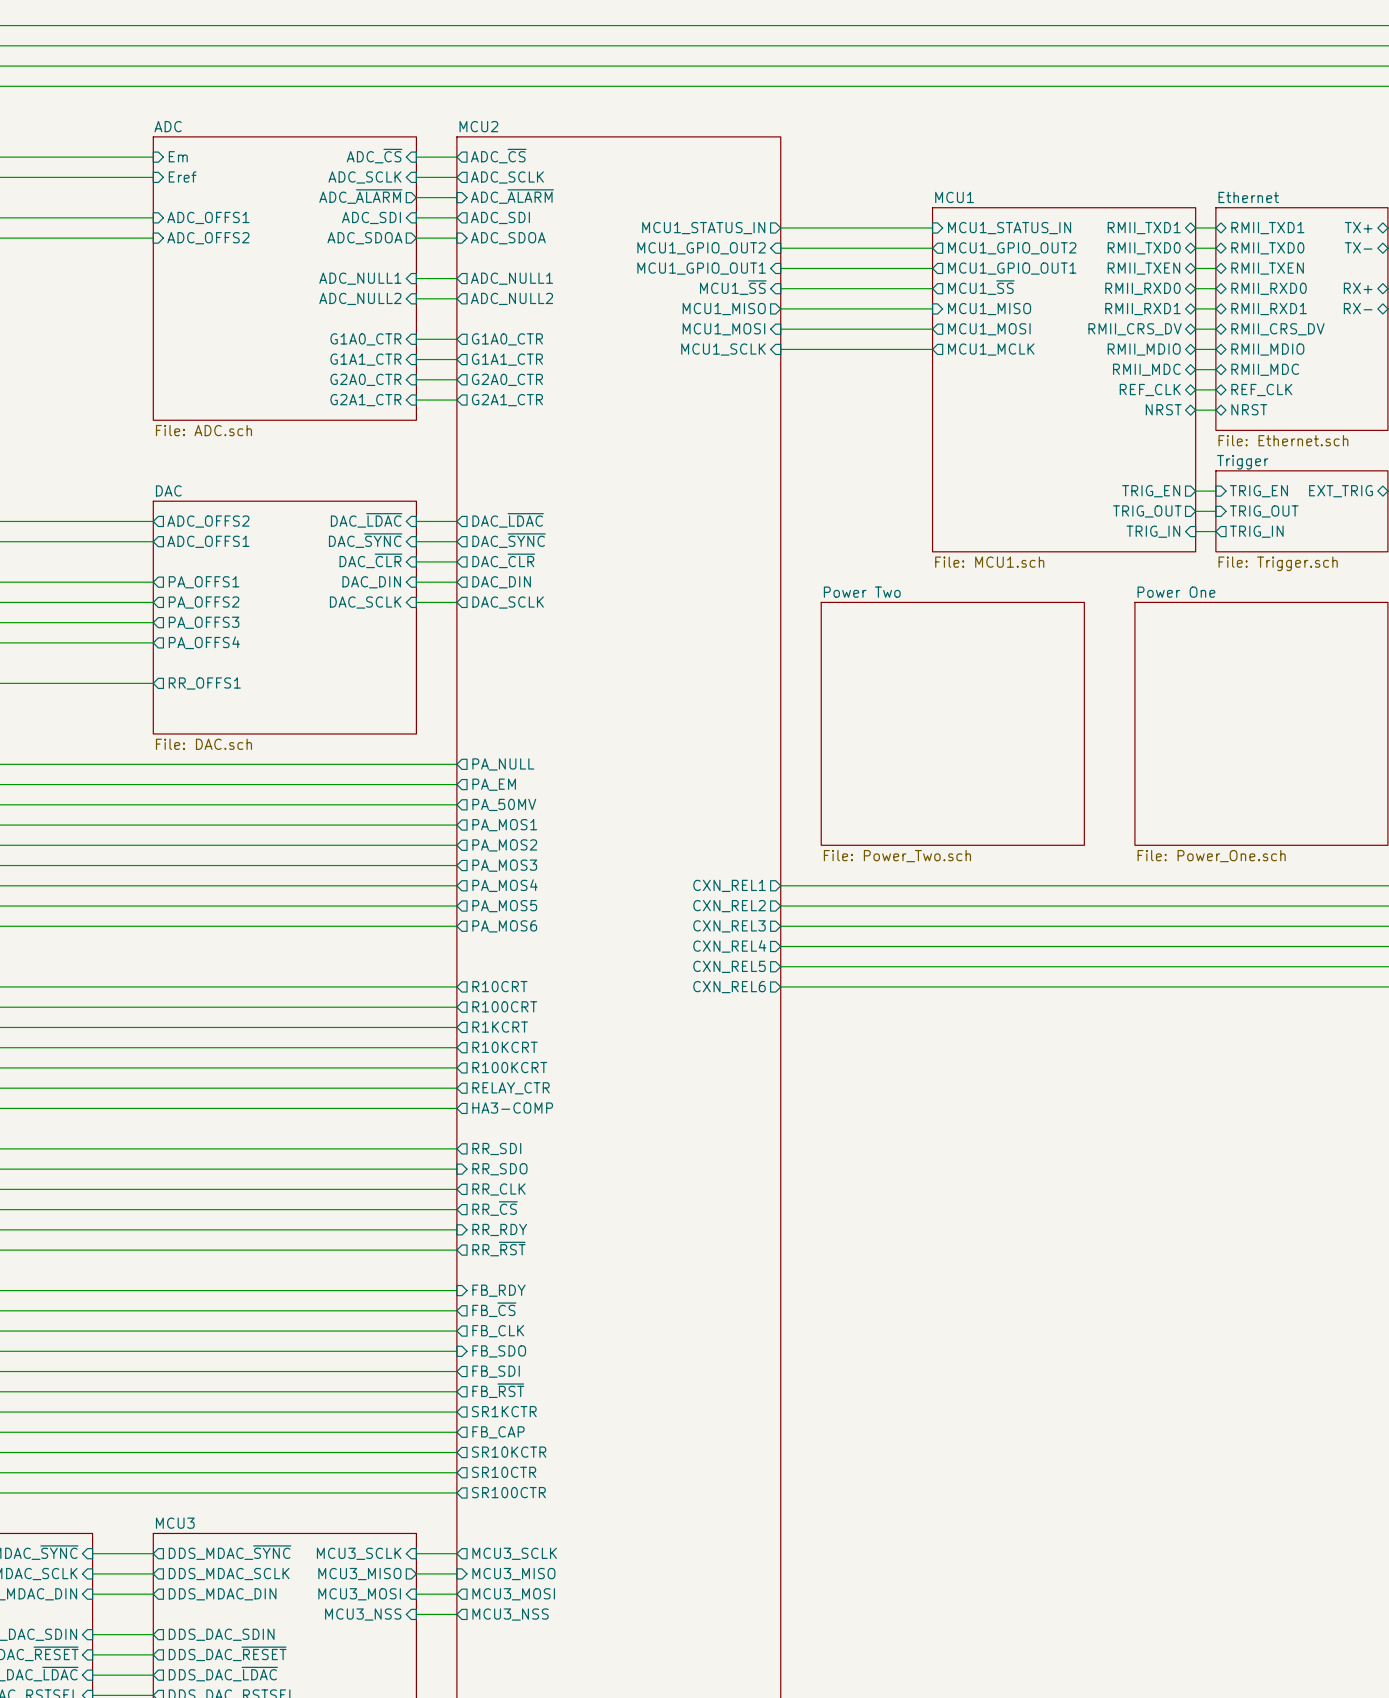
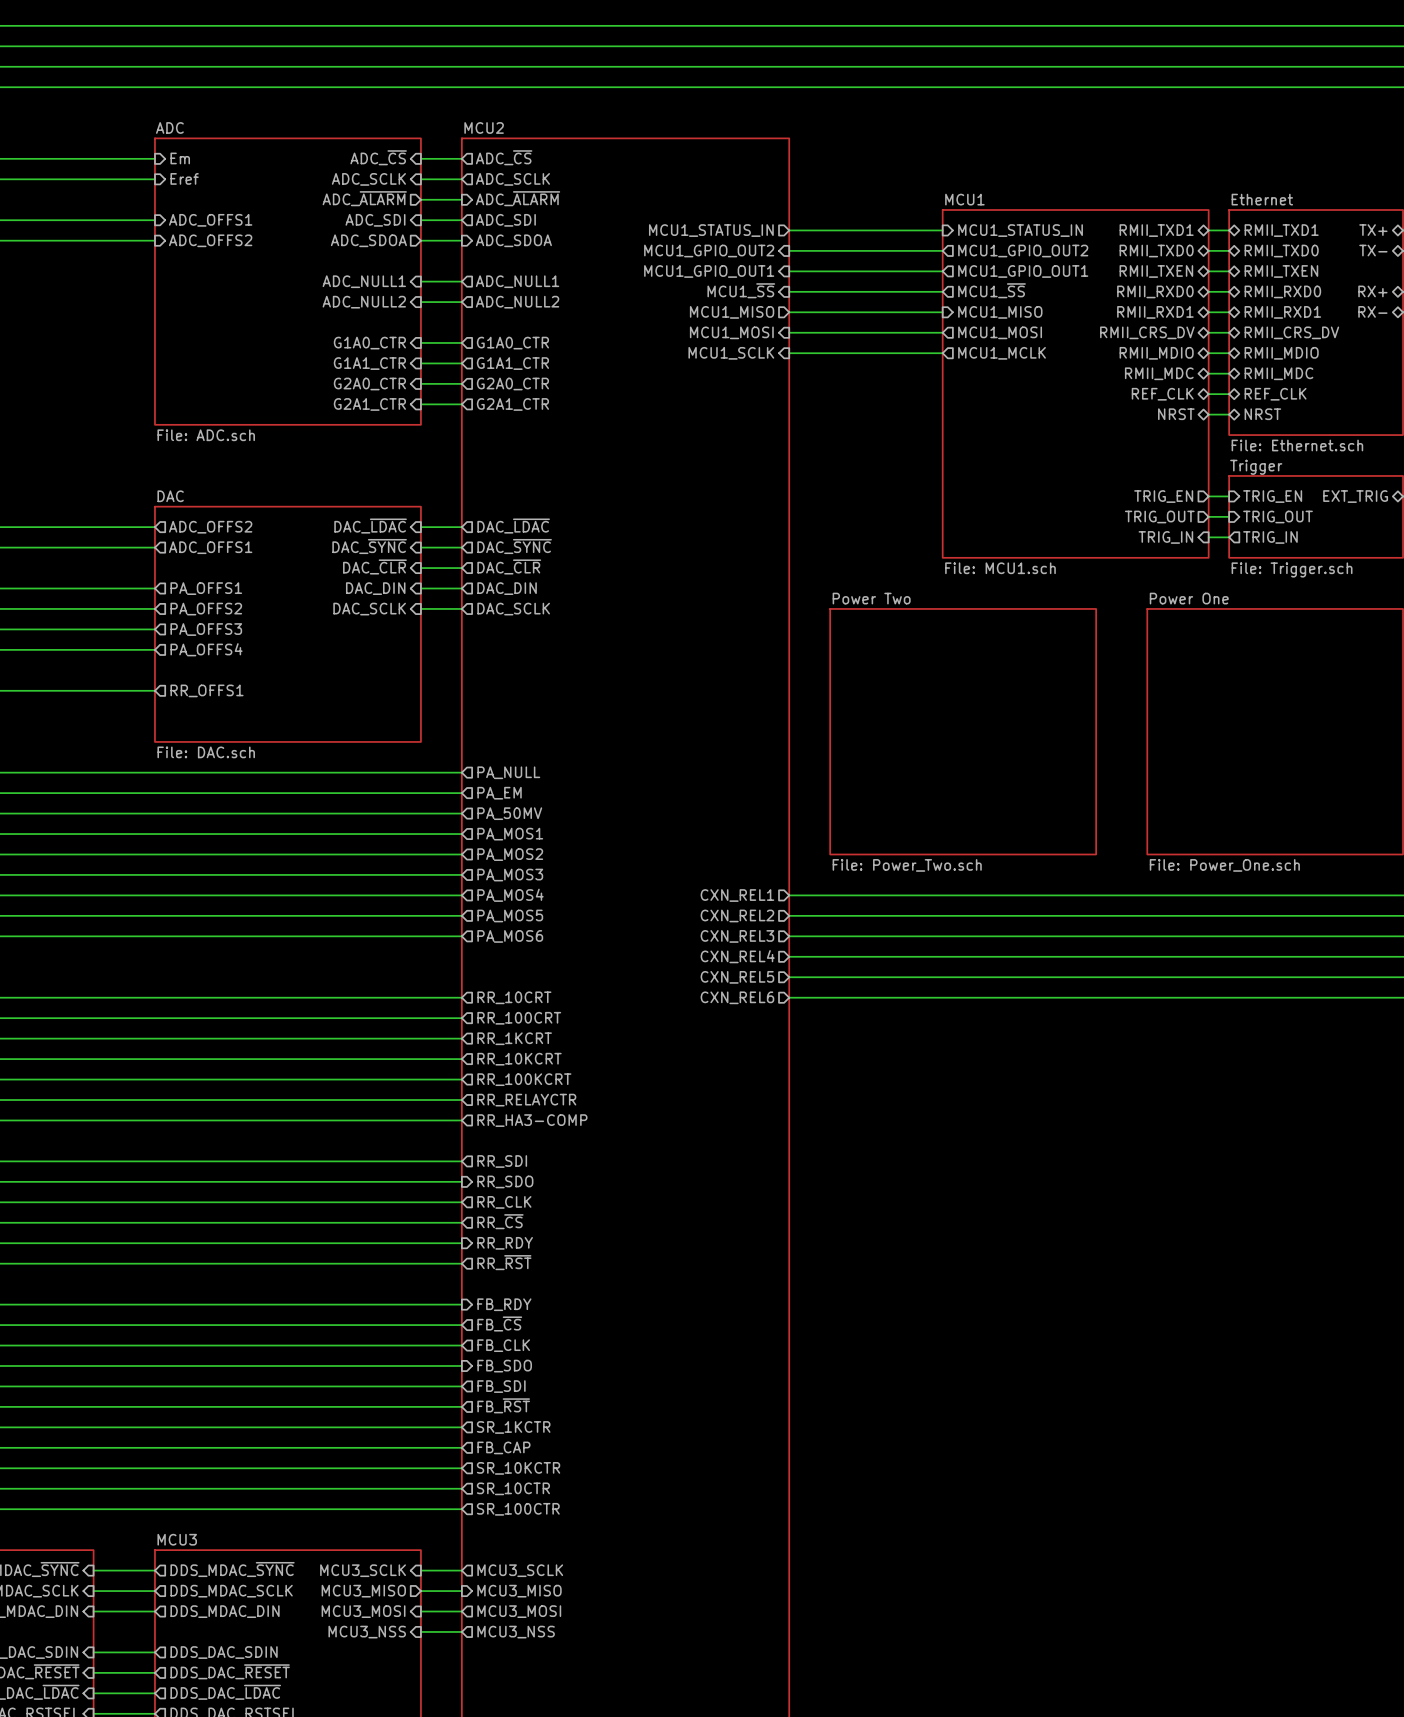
sheet pin: R10CRT (499, 986) -> RR_10CRT (514, 997)
sheet pin: R100CRT (504, 1006) -> RR_100CRT (519, 1018)
sheet pin: R1KCRT (500, 1027) -> RR_1KCRT (514, 1038)
sheet pin: R10KCRT (505, 1047) -> RR_10KCRT (519, 1059)
sheet pin: R100KCRT (509, 1067) -> RR_100KCRT (524, 1079)
sheet pin: RELAY_CTR (511, 1088) -> RR_RELAYCTR (526, 1100)
sheet pin: HA3-COMP (512, 1108) -> RR_HA3-COMP (532, 1120)
sheet pin: SR1KCTR (504, 1411) -> SR_1KCTR (513, 1427)
sheet pin: SR10KCTR (509, 1452) -> SR_10KCTR (518, 1468)
sheet pin: SR10CTR (504, 1472) -> SR_10CTR (513, 1488)
sheet pin: SR100CTR (508, 1492) -> SR_100CTR (518, 1509)

